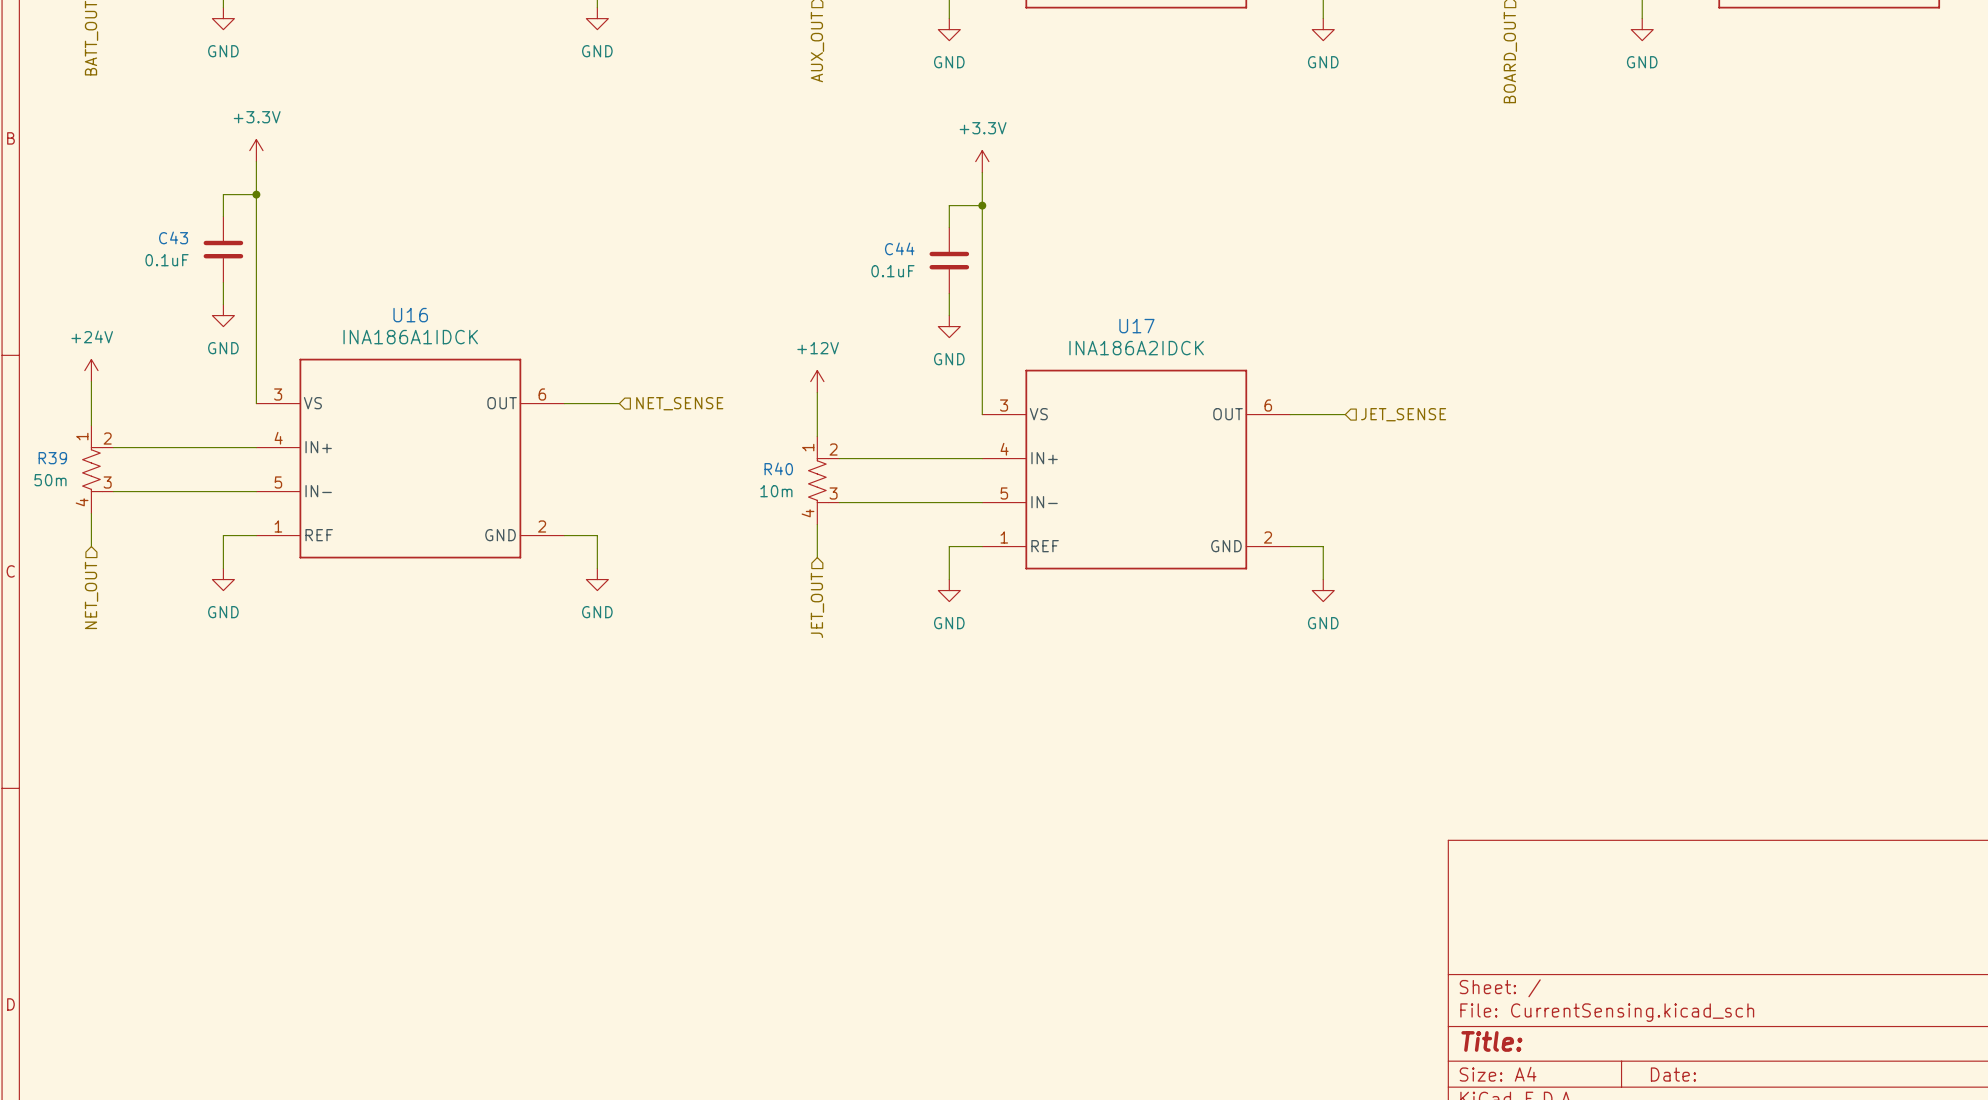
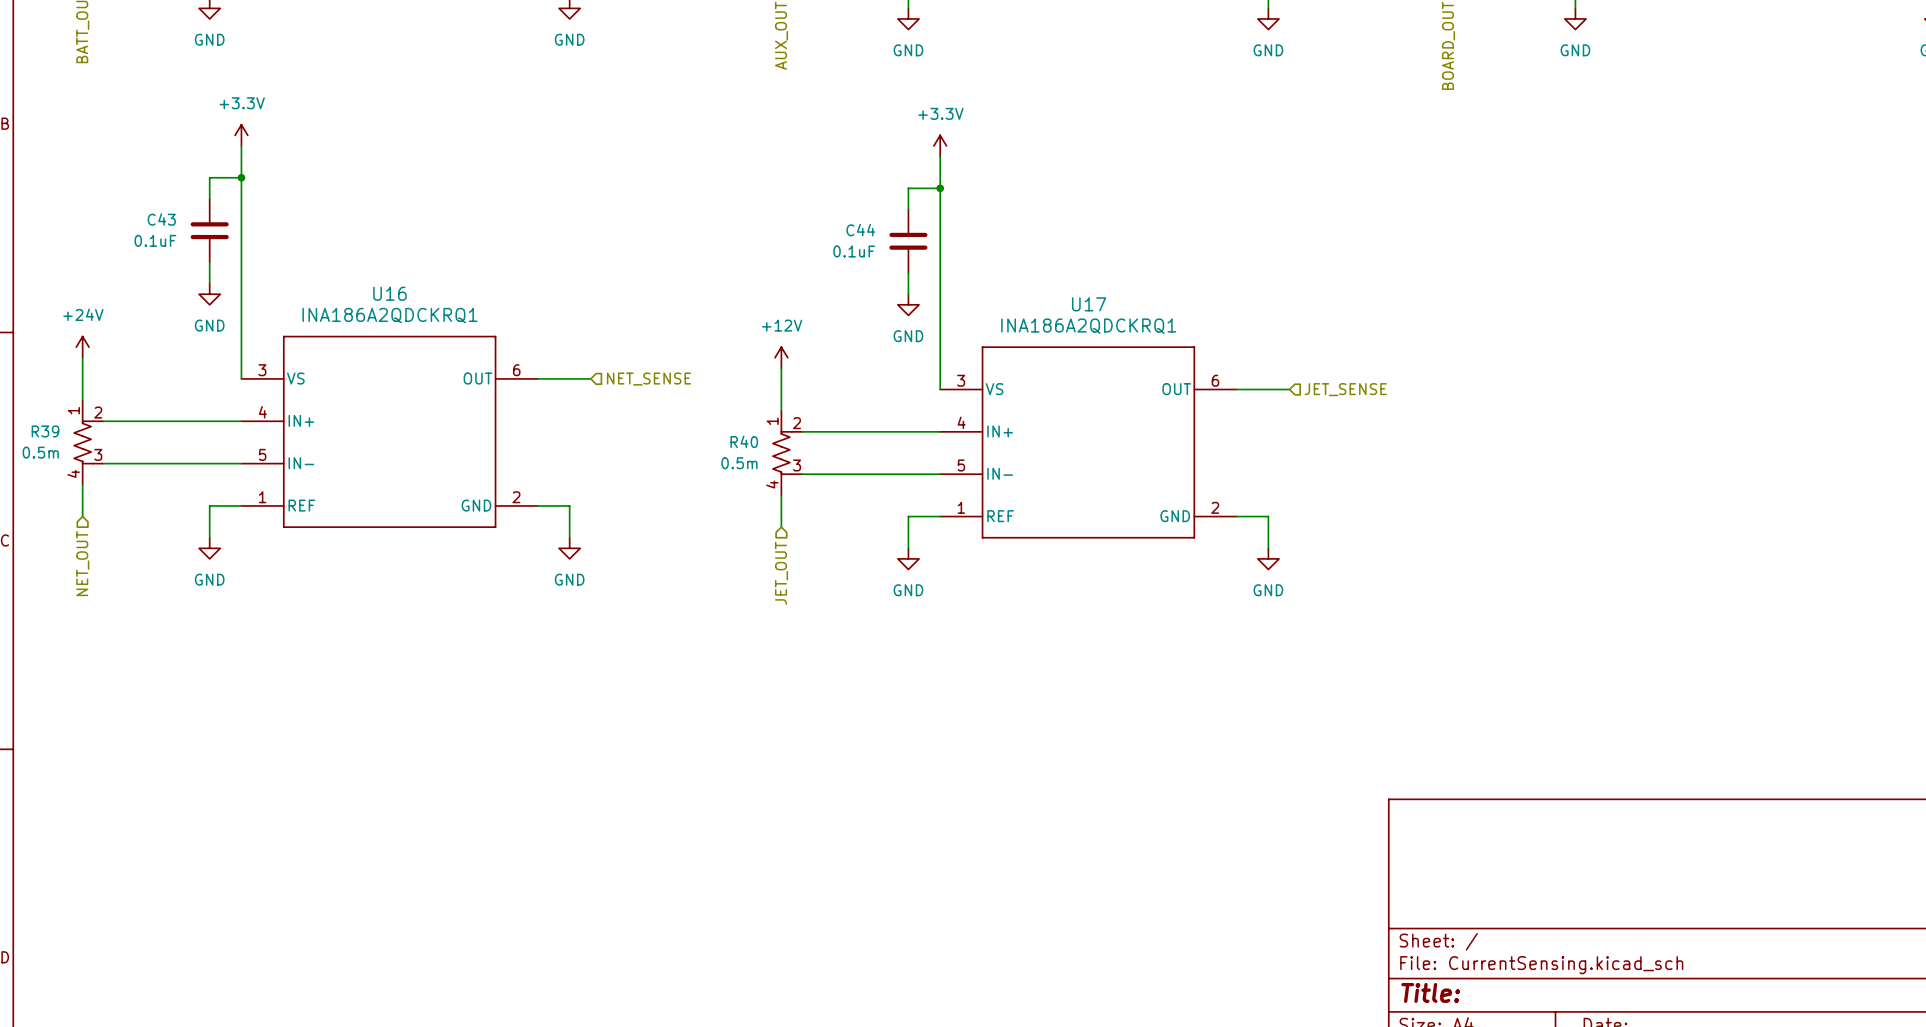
U16 value: INA186A1IDCK (410, 337) -> INA186A2QDCKRQ1 (389, 315)
U17 value: INA186A2IDCK (1136, 348) -> INA186A2QDCKRQ1 (1088, 326)
R39 value: 50m (50, 480) -> 0.5m (40, 452)
R40 value: 10m (776, 491) -> 0.5m (739, 463)

